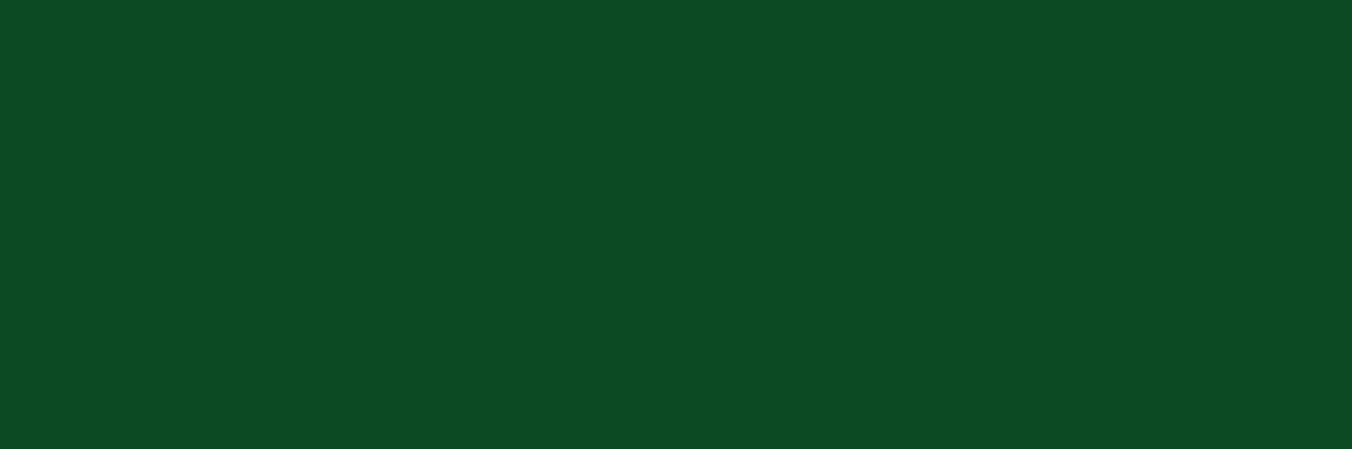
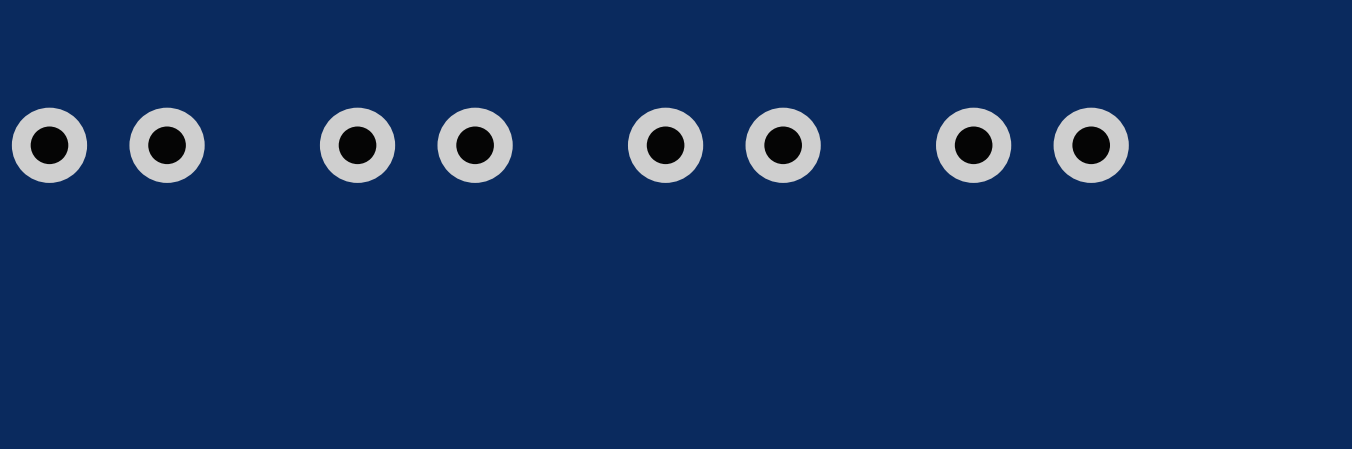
part: none -> (108, 145)
part: none -> (416, 145)
part: none -> (724, 145)
part: none -> (1032, 145)

